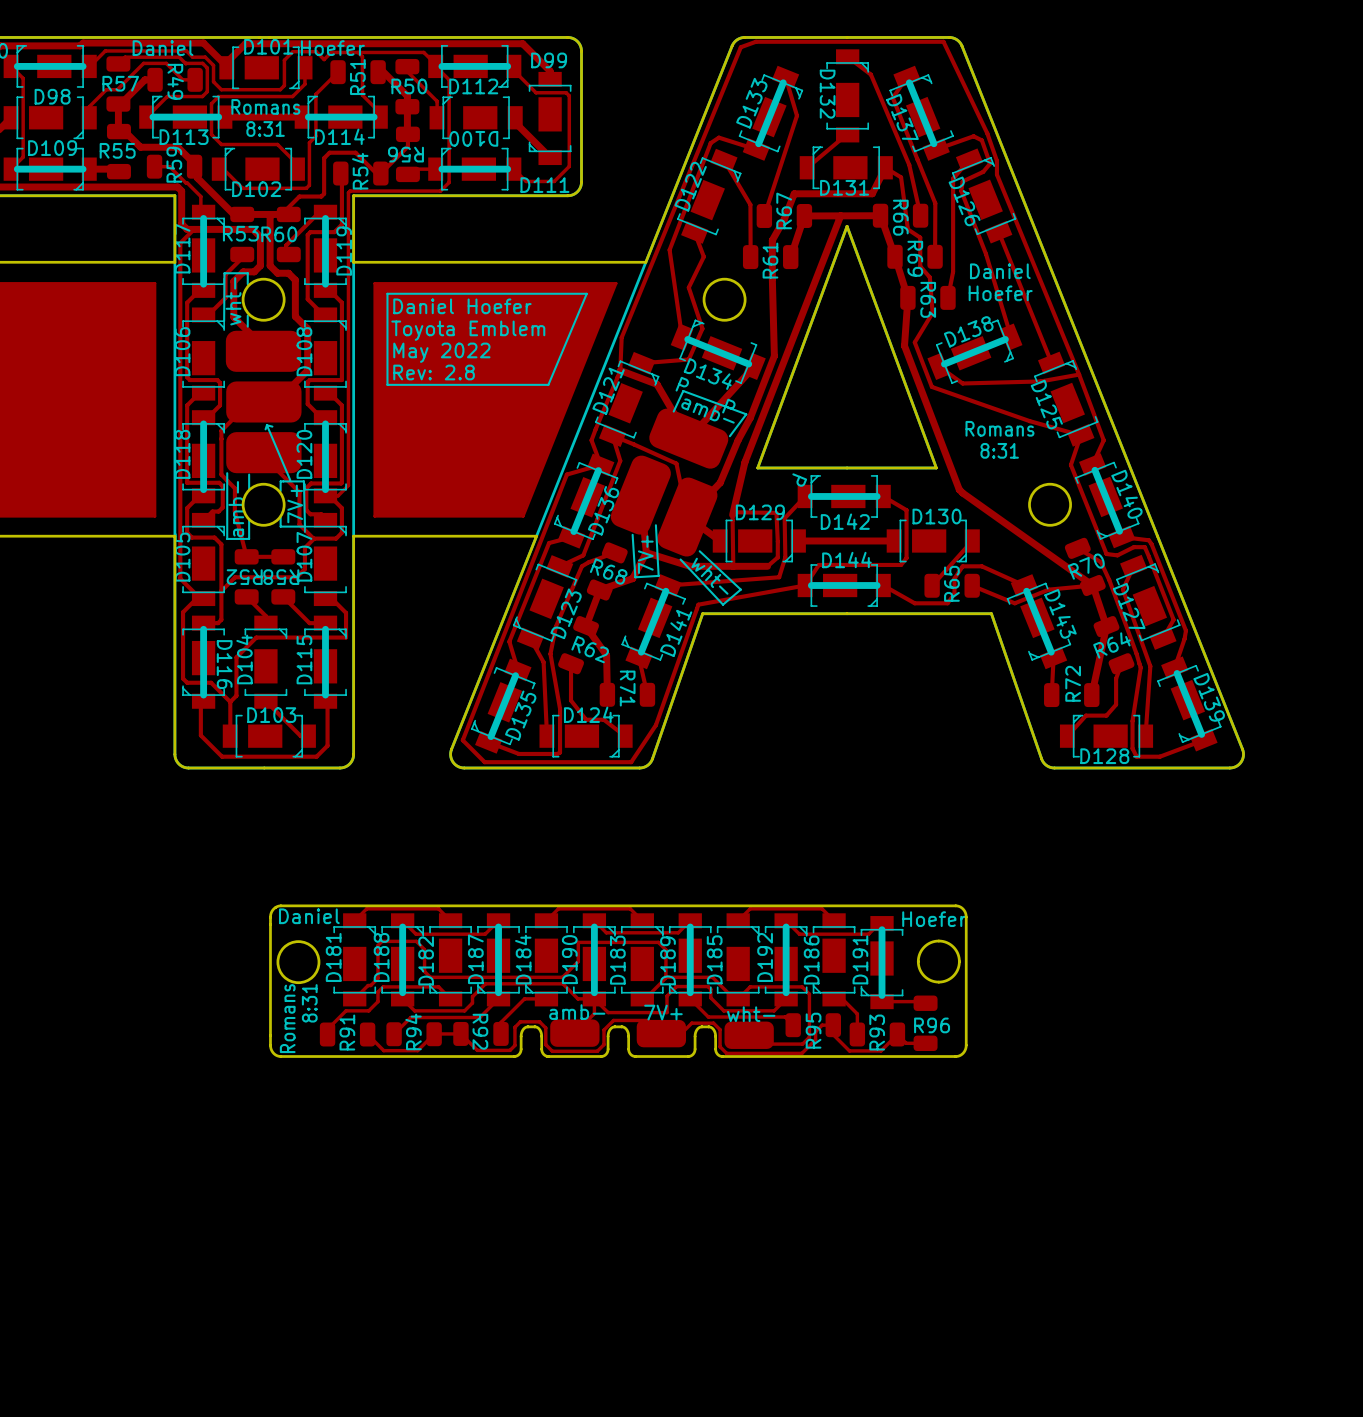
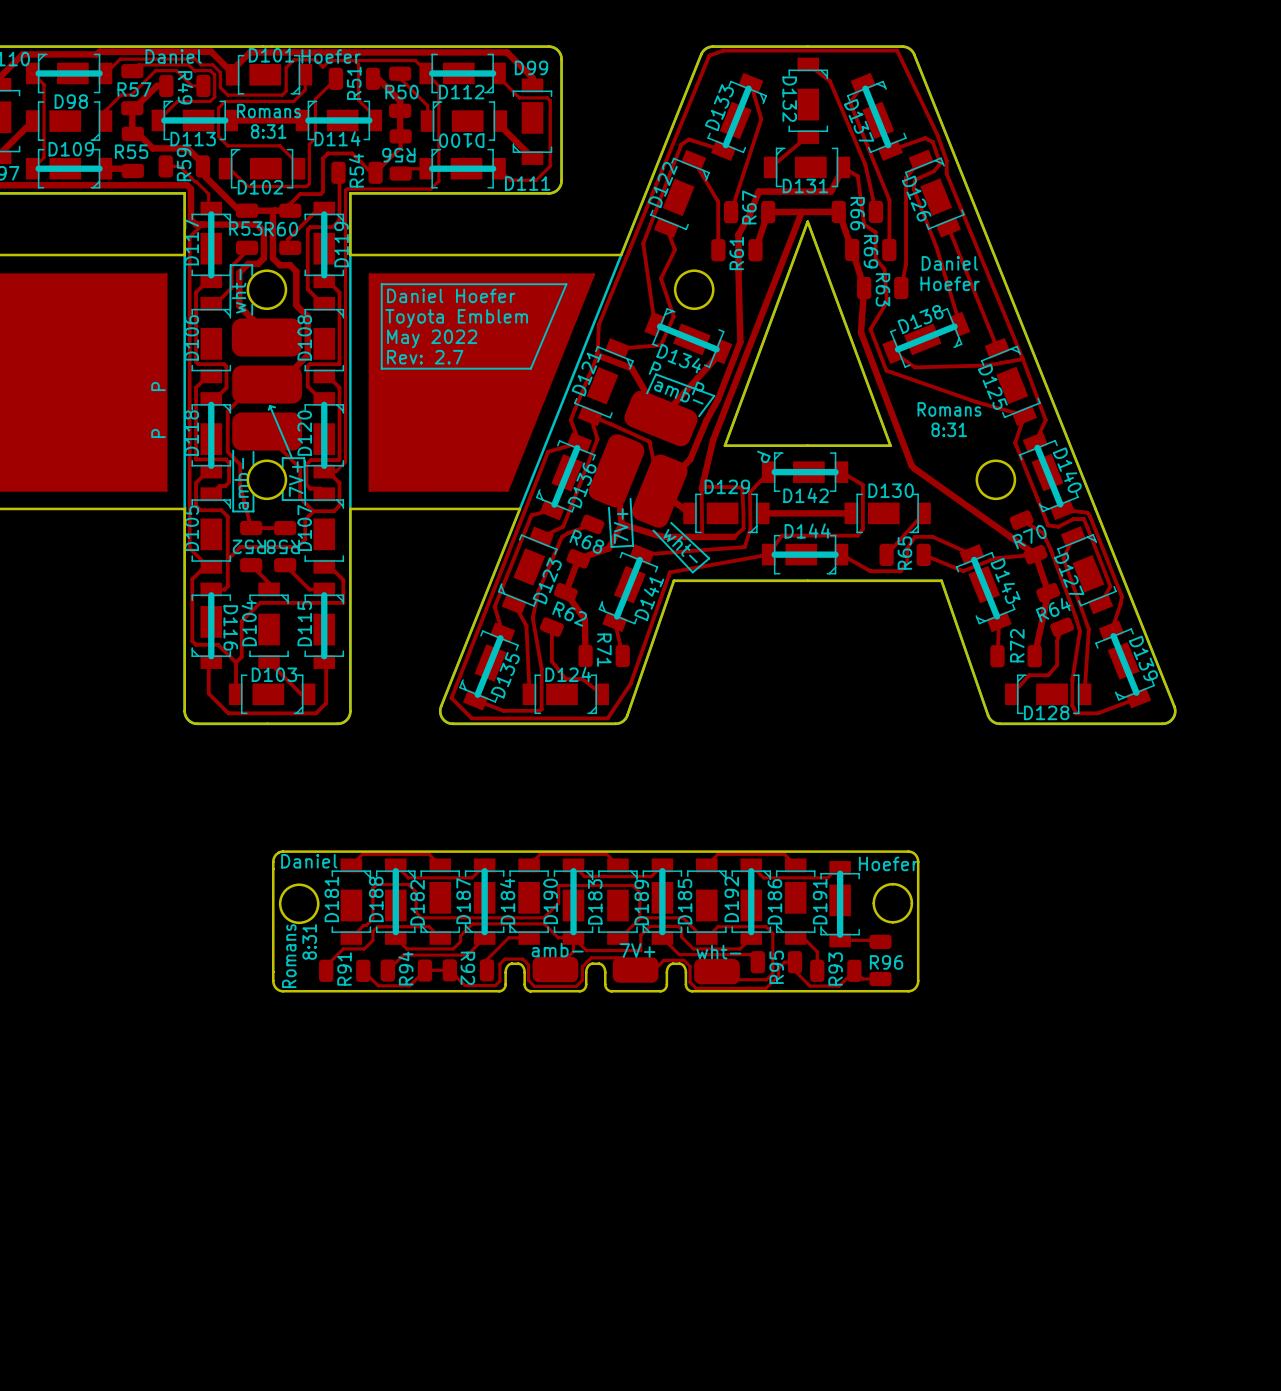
text: Rev: 2.8 (434, 372) -> Rev: 2.7 (425, 357)
P name: none -> P (158, 386)
P name: none -> P (158, 433)

